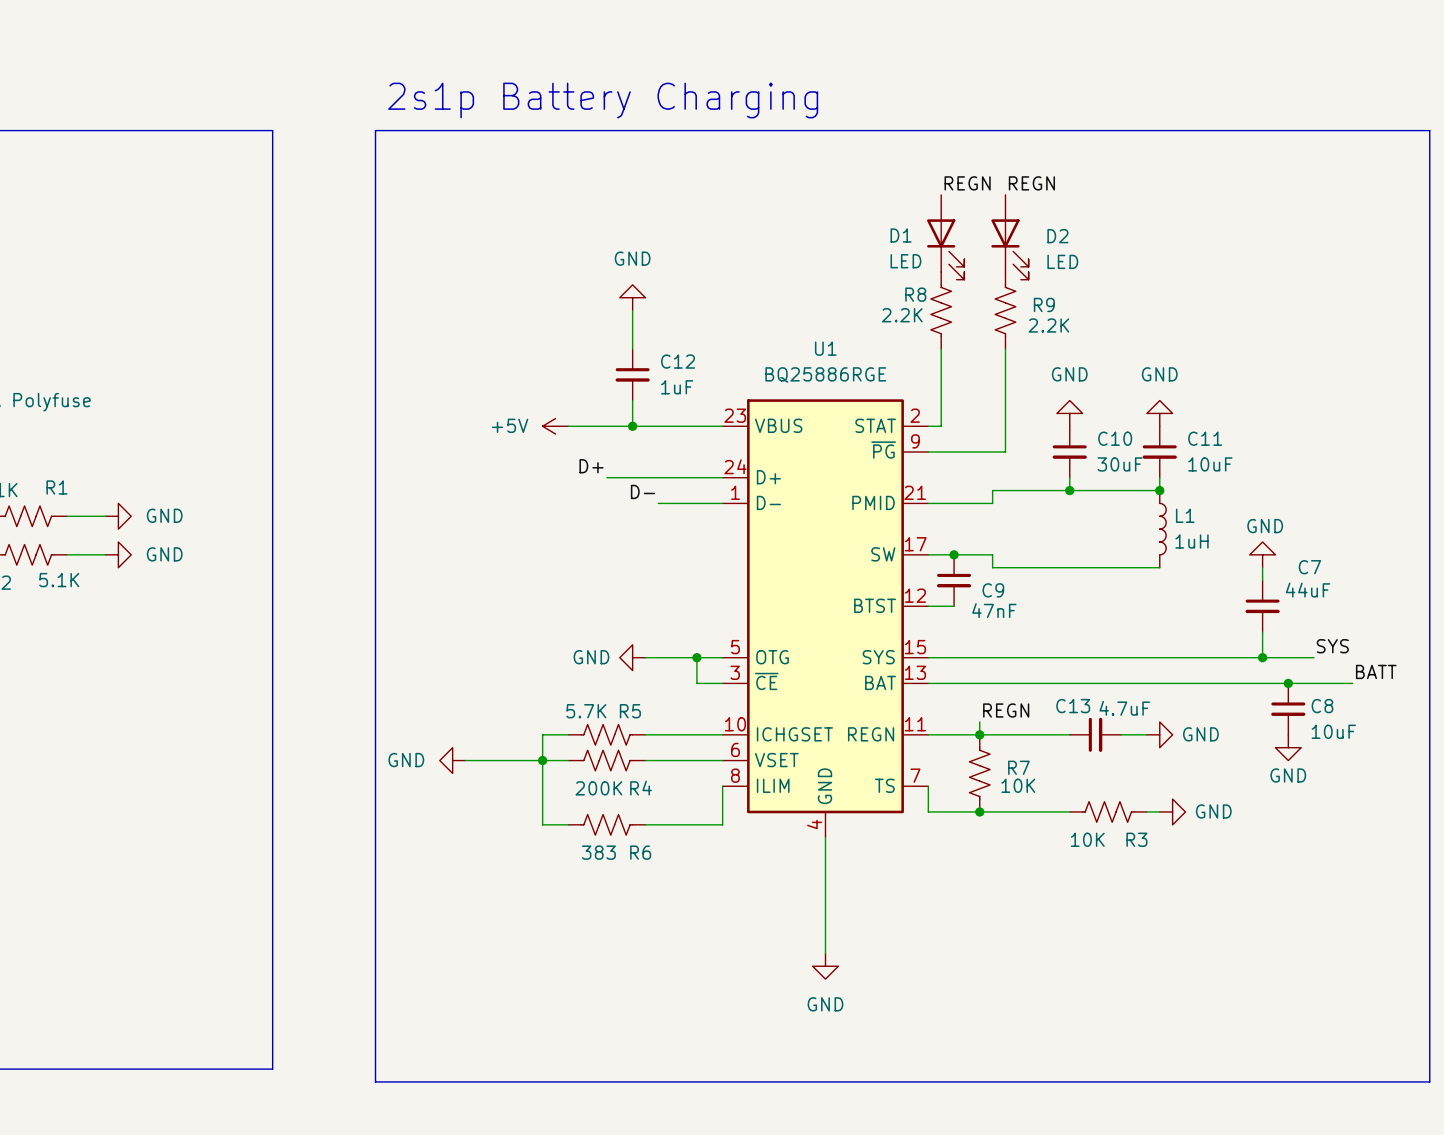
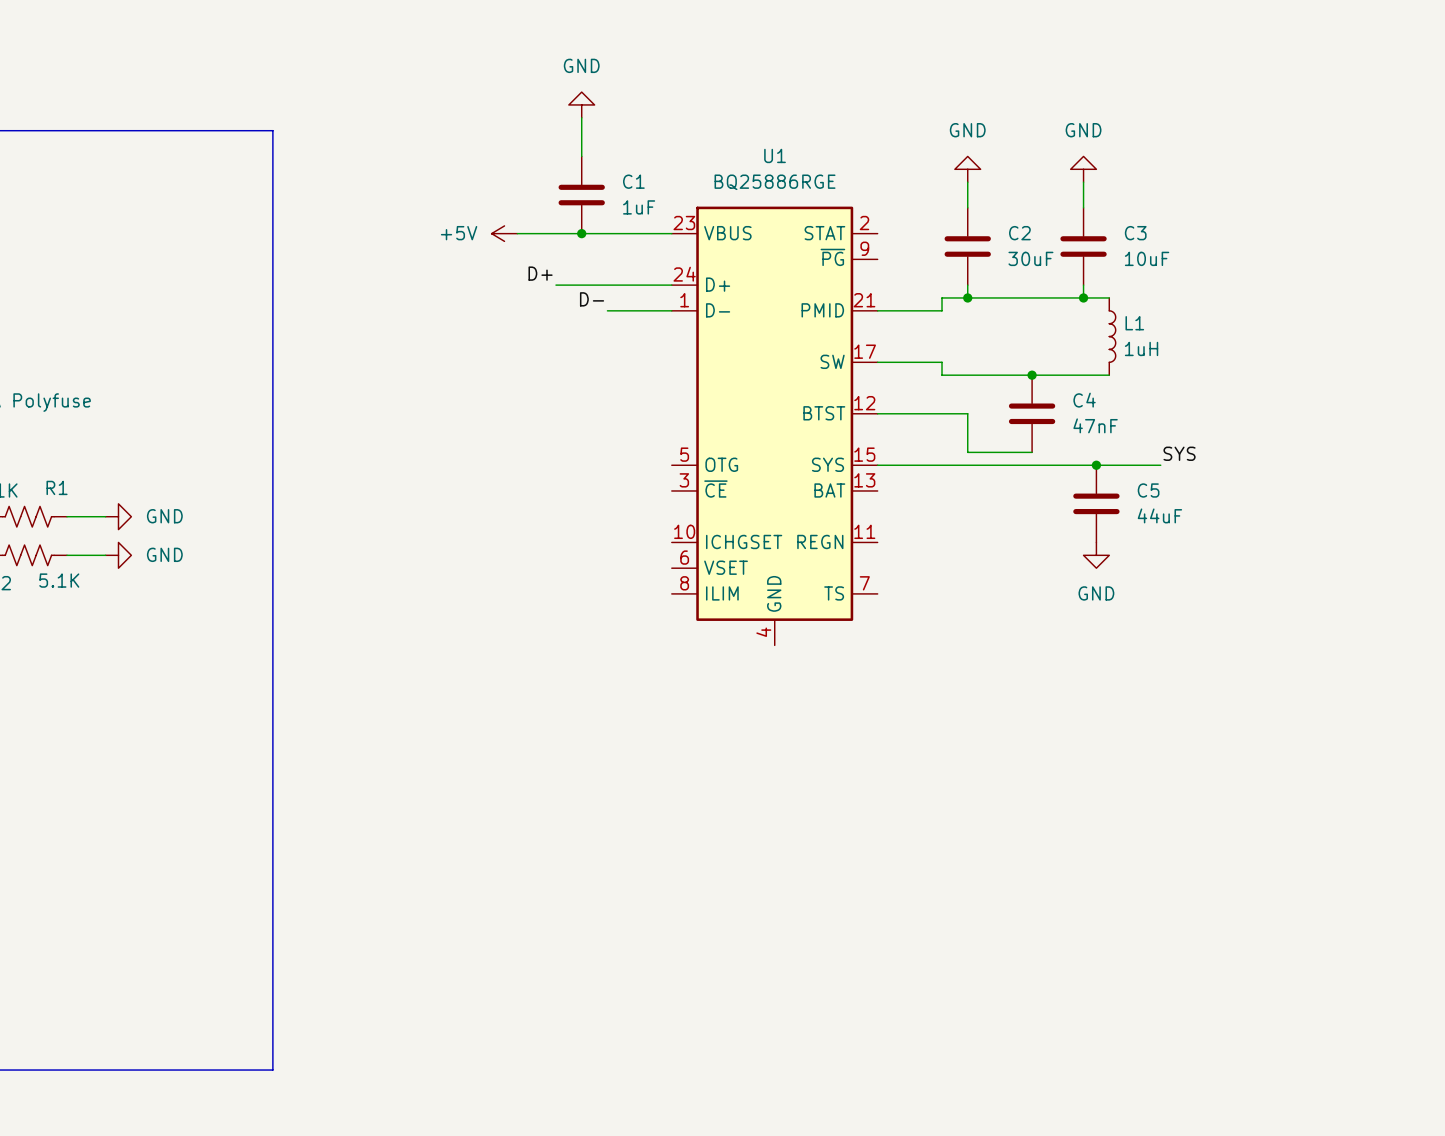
text: 2s1p Battery Charging (603, 100) -> none
power symbol: none -> GND (581, 104)
line: (375, 130) (1429, 130) (1429, 1081) (375, 1081) (375, 130) -> none
power symbol: none -> GND (967, 169)
power symbol: none -> GND (1083, 169)
wire: none -> (967, 182) (967, 207)
wire: none -> (1083, 182) (1083, 207)
label: REGN (967, 183) -> none
label: REGN (1031, 183) -> none
C1: none -> 1uF (581, 195)
junction: none -> (581, 233)
D1: LED (945, 237) -> none
D2: LED (1009, 237) -> none
C2: none -> 30uF (967, 246)
C3: none -> 10uF (1083, 246)
wire: none -> (967, 285) (967, 297)
power symbol: GND (632, 297) -> none
junction: none -> (967, 297)
junction: none -> (1083, 297)
wire: none -> (1109, 297) (942, 297) (942, 310) (877, 310)
wire: (632, 310) (632, 349) -> (581, 117) (581, 156)
R8: 2.2K (941, 310) -> none
R9: 2.2K (1005, 310) -> none
wire: (941, 349) (941, 362) -> (877, 362) (942, 362)
wire: (1005, 349) (1005, 452) -> (1032, 452) (1006, 452)
C12: 1uF (632, 374) -> none
wire: (941, 374) (941, 426) (928, 426) -> (942, 375) (1109, 375)
junction: none -> (1032, 375)
wire: (632, 400) (632, 426) -> none
C4: none -> 47nF (1032, 413)
power symbol: GND (1069, 413) -> none
power symbol: GND (1159, 413) -> none
power symbol position: +5V (555, 426) -> +5V (504, 233)
wire: (568, 426) (722, 426) -> (517, 233) (671, 233)
junction: (632, 426) -> none
wire: (928, 452) (966, 452) -> (877, 413) (967, 413) (967, 452)
C10: 30uF (1069, 452) -> none
C11: 10uF (1159, 452) -> none
wire: none -> (877, 465) (1160, 465)
junction: none -> (1096, 465)
label position: D+ (591, 466) -> D+ (540, 273)
wire: (606, 477) (722, 477) -> (555, 285) (671, 285)
wire: (1069, 477) (1069, 490) -> (1083, 285) (1083, 297)
wire: (1159, 477) (1159, 490) (992, 490) (992, 503) (928, 503) -> none
junction: (1069, 490) -> none
junction: (1159, 490) -> none
label position: D- (642, 491) -> D- (592, 299)
wire: (658, 503) (722, 503) -> (607, 310) (671, 310)
C5: none -> 44uF (1096, 503)
L1 position: (1162, 529) -> (1112, 336)
wire: (928, 554) (992, 554) (992, 567) (1159, 567) -> none
junction: (954, 554) -> none
power symbol: none -> GND (1096, 555)
power symbol: GND (1262, 554) -> none
wire: (1262, 567) (1262, 580) -> none
C9: 47nF (954, 580) -> none
wire: (928, 606) (954, 606) -> none
C7: 44uF (1262, 606) -> none
U1 position: (825, 618) -> (774, 426)
wire: (1262, 631) (1262, 657) -> none
label position: SYS (1332, 646) -> SYS (1179, 453)
power symbol: GND (632, 657) -> none
wire: (645, 657) (722, 657) -> none
wire: (696, 657) (696, 683) (722, 683) -> none
junction: (696, 657) -> none
wire: (928, 657) (1314, 657) -> none
junction: (1262, 657) -> none
label: BATT (1376, 671) -> none
wire: (928, 683) (1352, 683) -> none
junction: (1288, 683) -> none
C8: 10uF (1288, 709) -> none
label: REGN (1006, 710) -> none
wire: (979, 721) (979, 734) -> none
wire: (568, 734) (542, 734) (542, 824) (568, 824) -> none
R5: 5.7K (606, 734) -> none
wire: (645, 734) (722, 734) -> none
wire: (928, 734) (1069, 734) -> none
junction: (979, 734) -> none
C13: 4.7uF (1095, 734) -> none
wire: (1121, 734) (1146, 734) -> none
power symbol: GND (1159, 734) -> none
power symbol: GND (1288, 747) -> none
power symbol: GND (452, 760) -> none
wire: (465, 760) (568, 760) -> none
junction: (542, 760) -> none
R4: 200K (606, 760) -> none
wire: (645, 760) (722, 760) -> none
R7: 10K (979, 773) -> none
wire: (722, 786) (722, 824) (645, 824) -> none
wire: (928, 786) (928, 811) (1069, 811) -> none
junction: (979, 811) -> none
R3: 10K (1108, 811) -> none
wire: (1146, 811) (1159, 811) -> none
power symbol: GND (1172, 811) -> none
R6: 383 (606, 824) -> none
wire: (825, 837) (825, 953) -> none
power symbol: GND (825, 966) -> none

